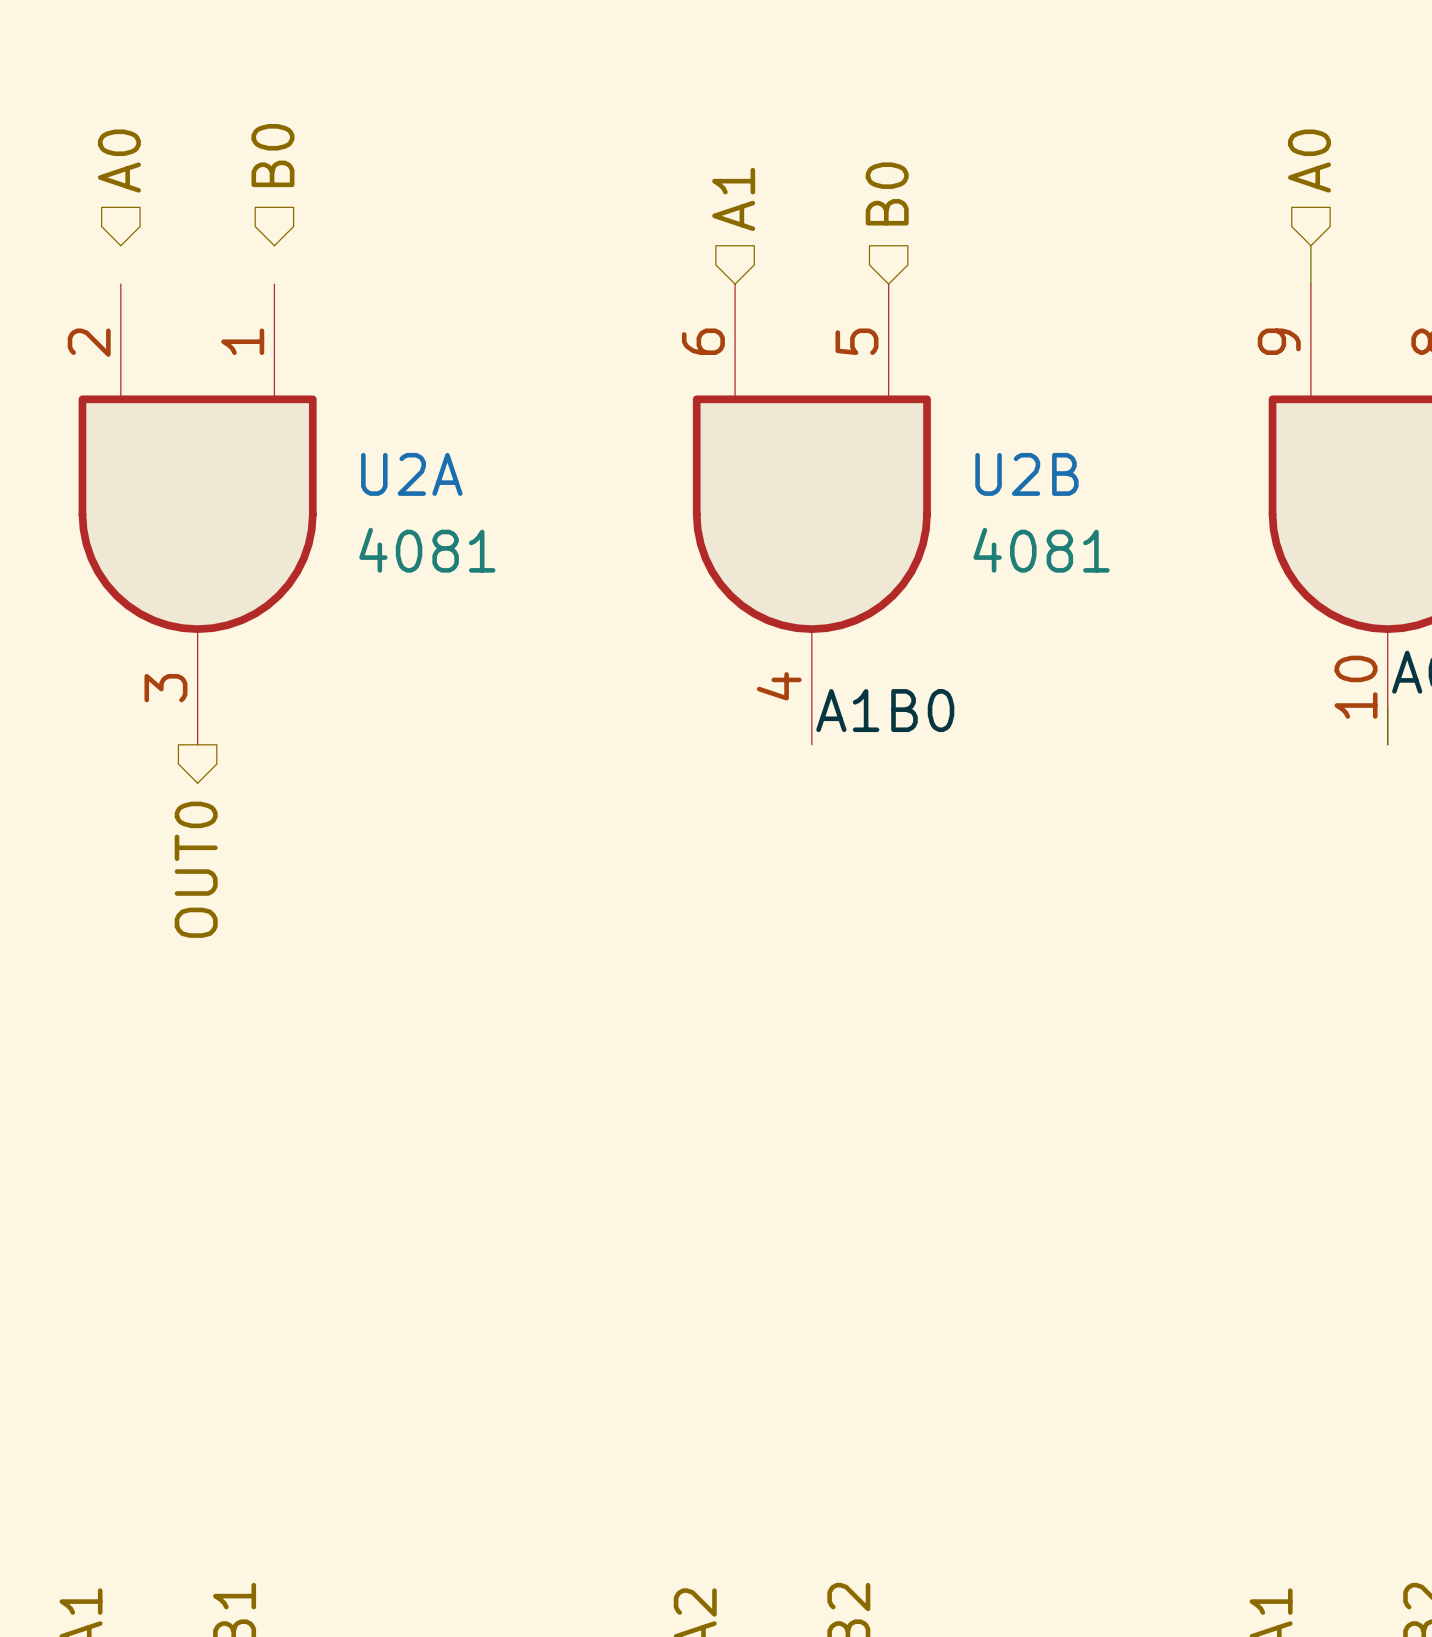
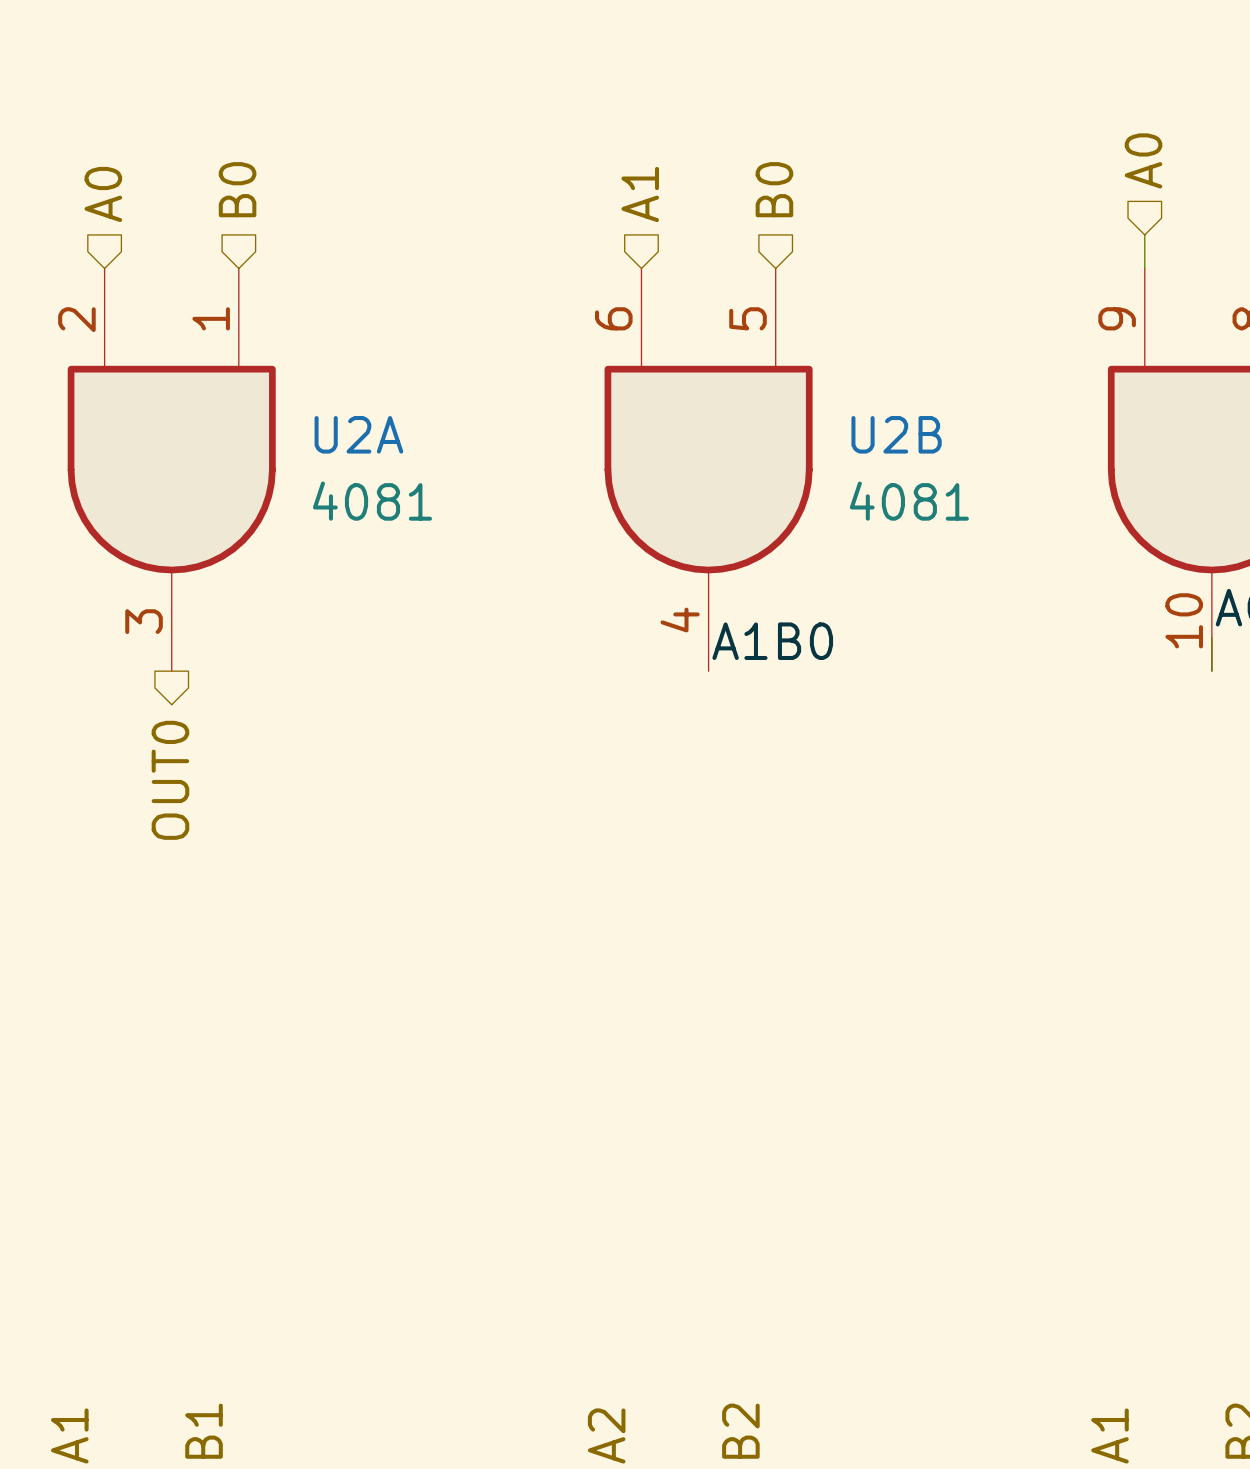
hierarchical label position: B0 (272, 155) -> B0 (237, 189)
hierarchical label position: A0 (119, 161) -> A0 (103, 194)

